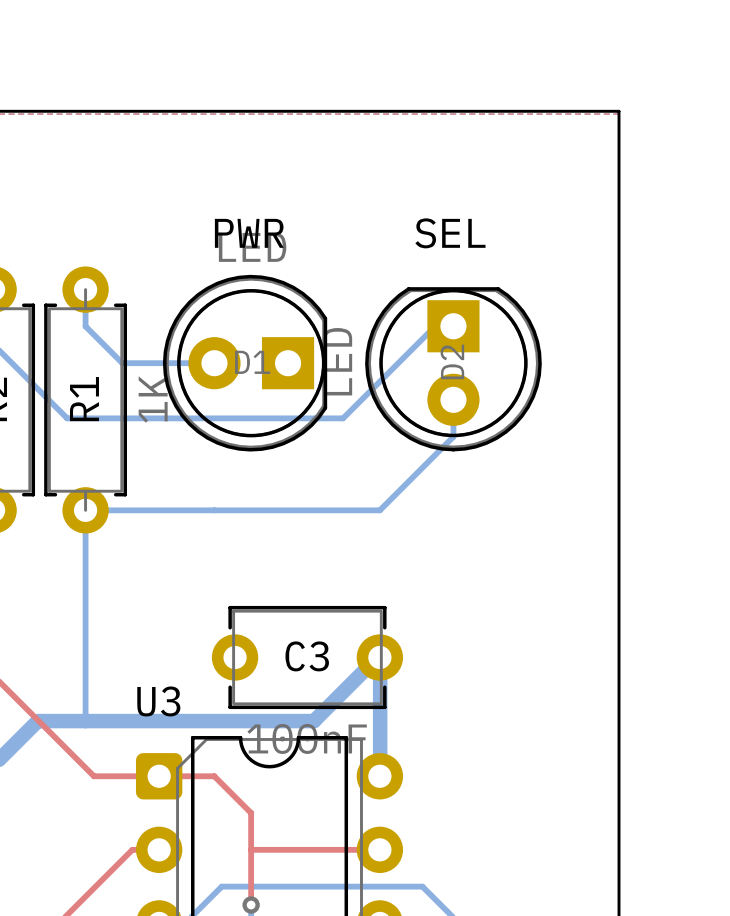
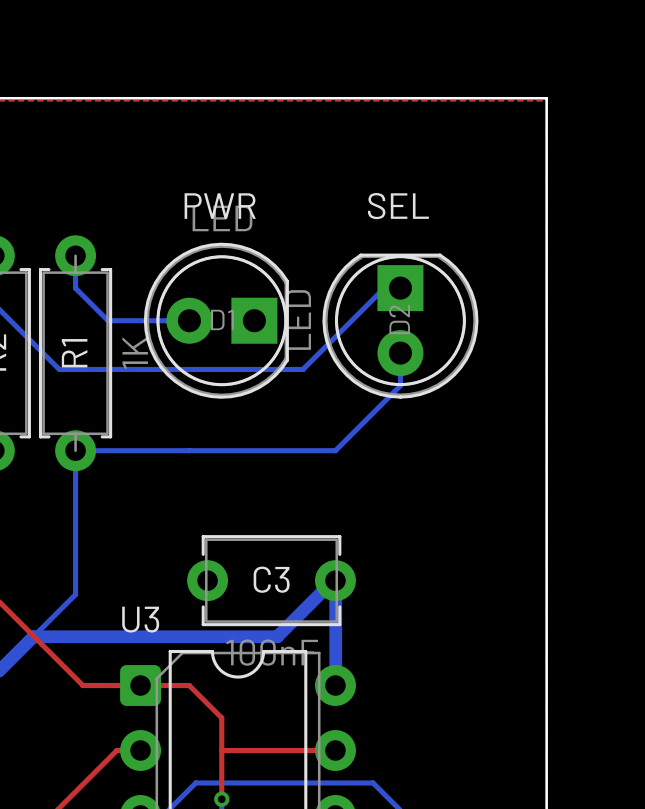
bottom track: (85, 673) (85, 721) -> (75, 594) (33, 636)

